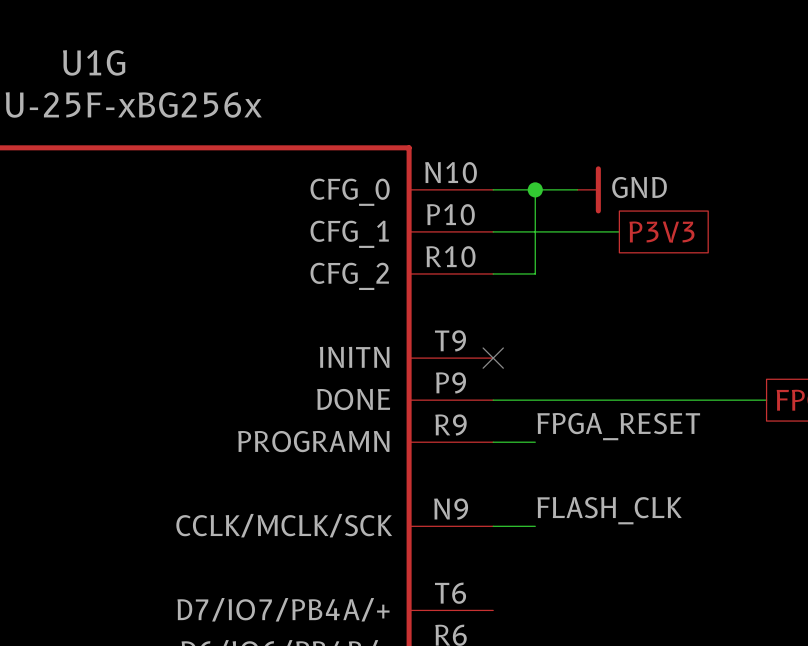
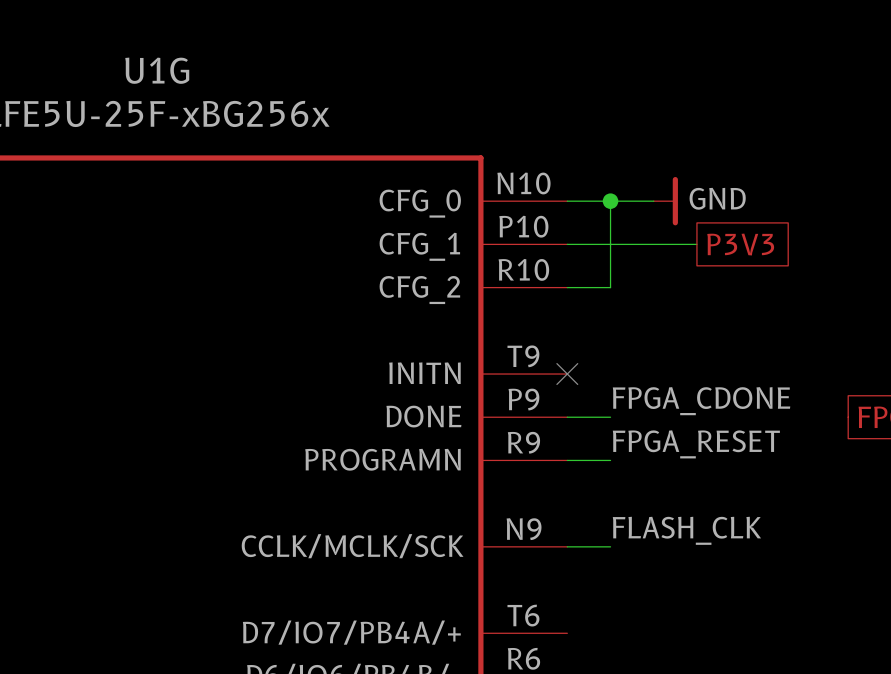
label: none -> FPGA_CDONE (701, 401)
wire: (535, 400) (766, 400) -> none

